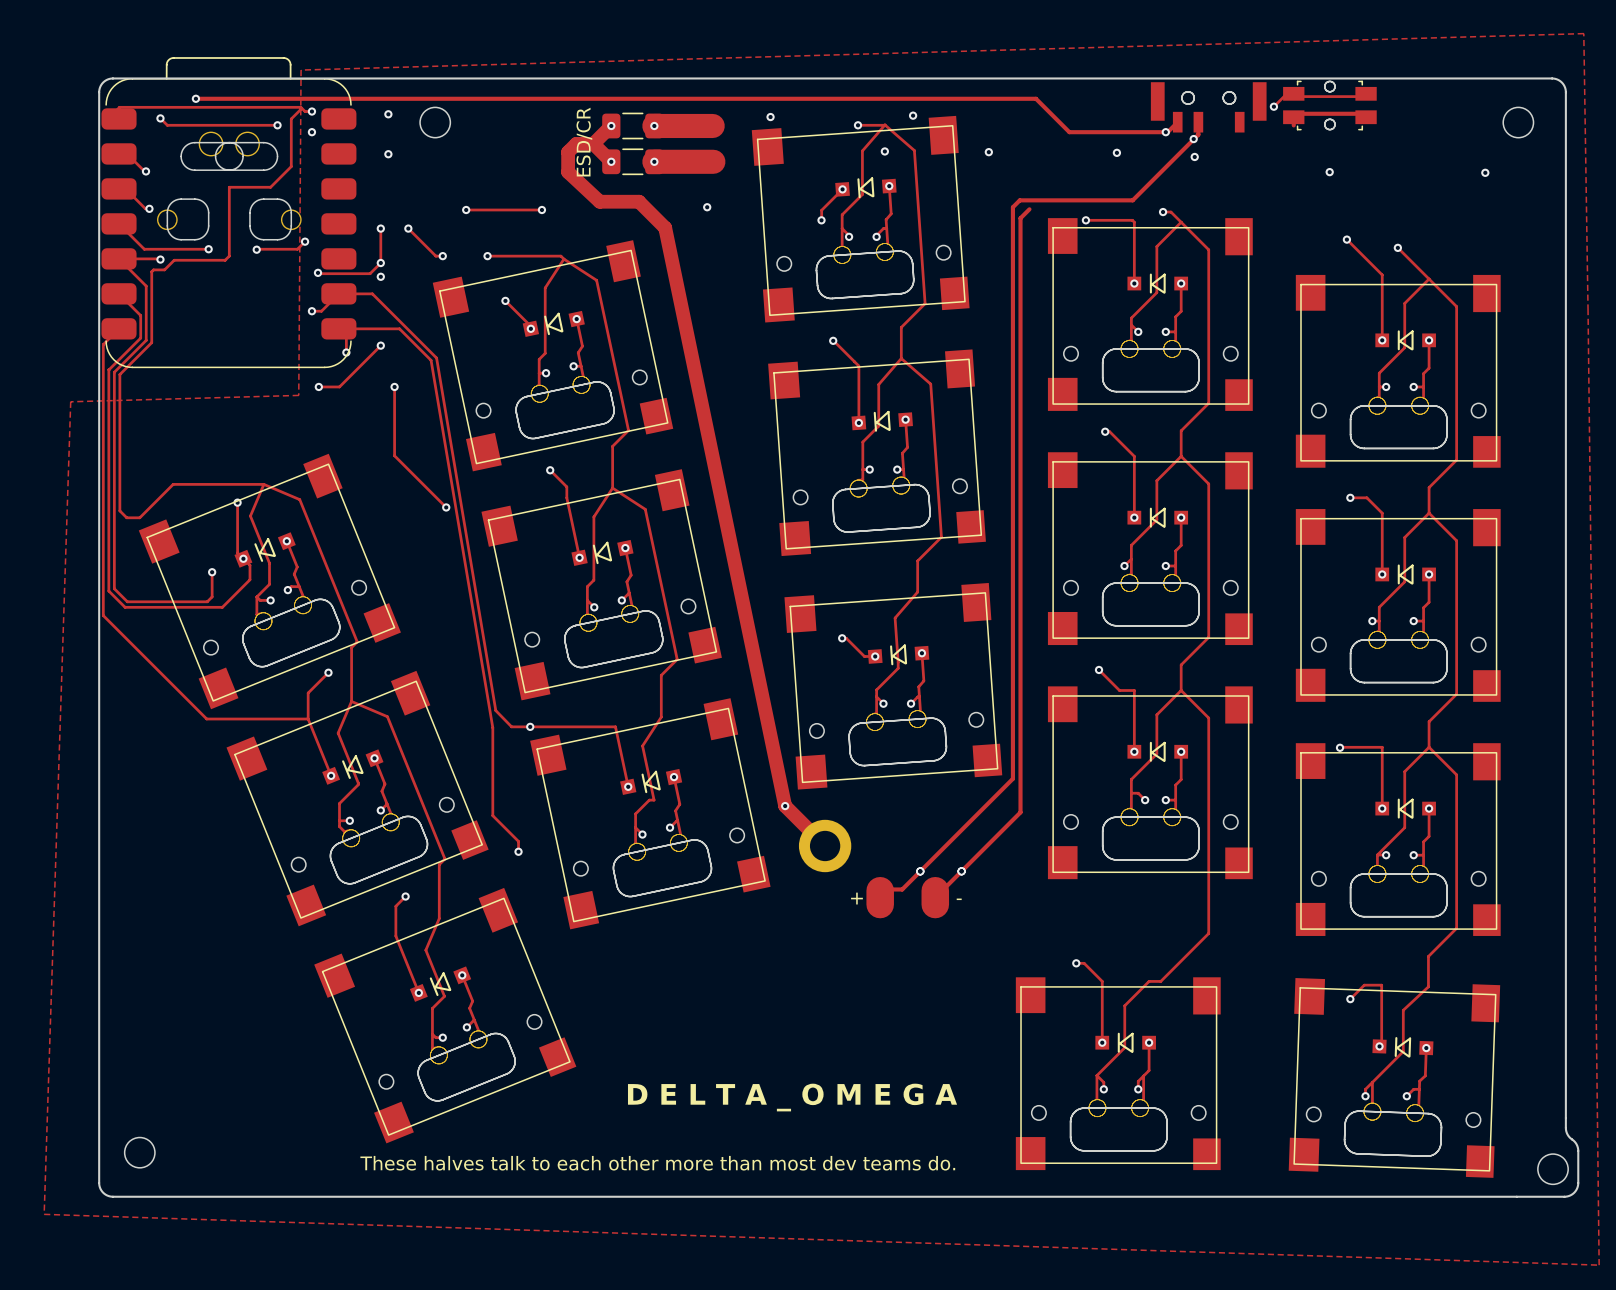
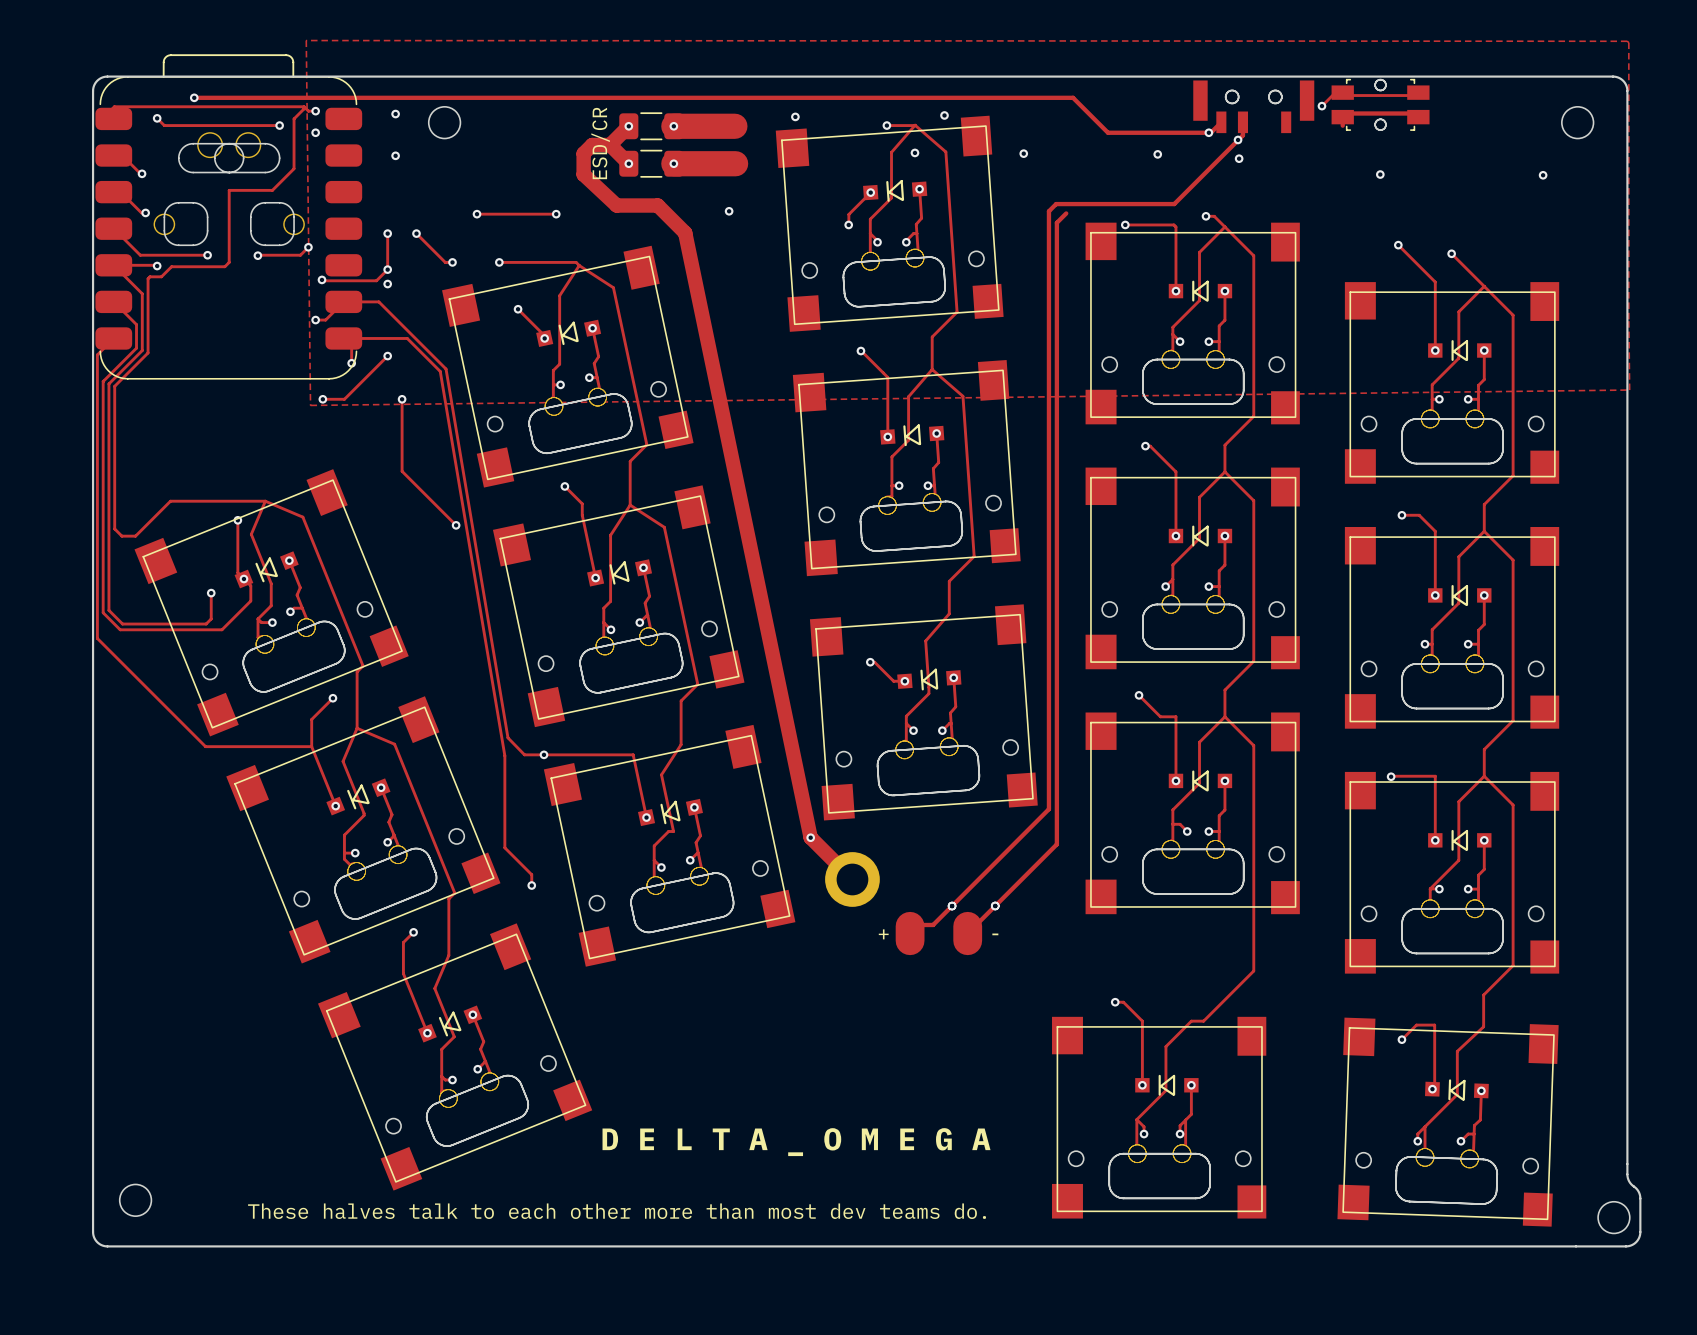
zone outline: (1583, 33) (1599, 1265) (44, 1214) (70, 401) (298, 395) (301, 70) (1583, 33) -> none
zone outline: none -> (306, 40) (310, 405) (1629, 390) (1627, 41) (306, 40)

